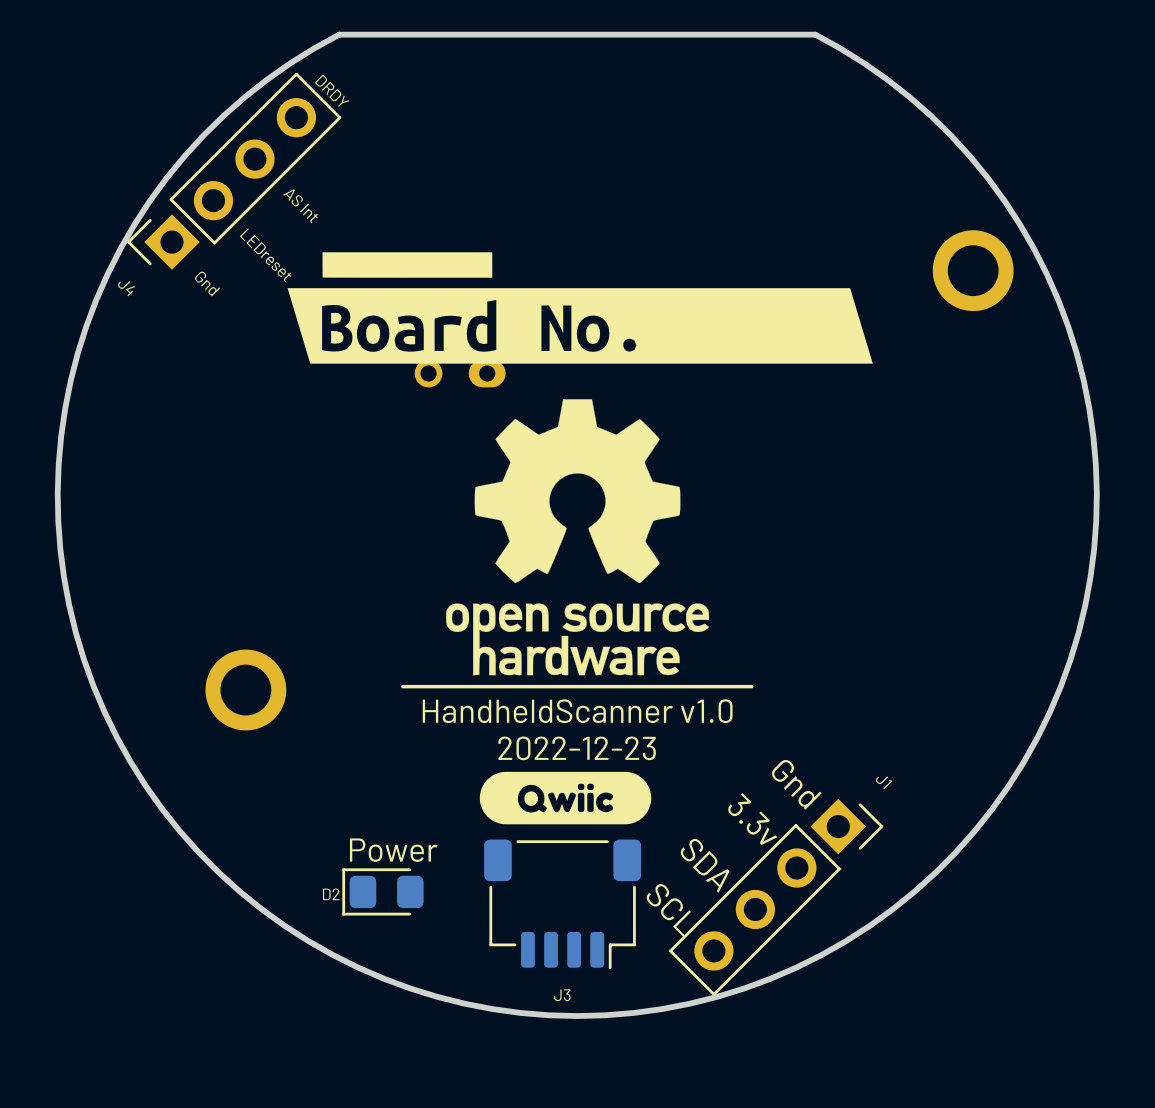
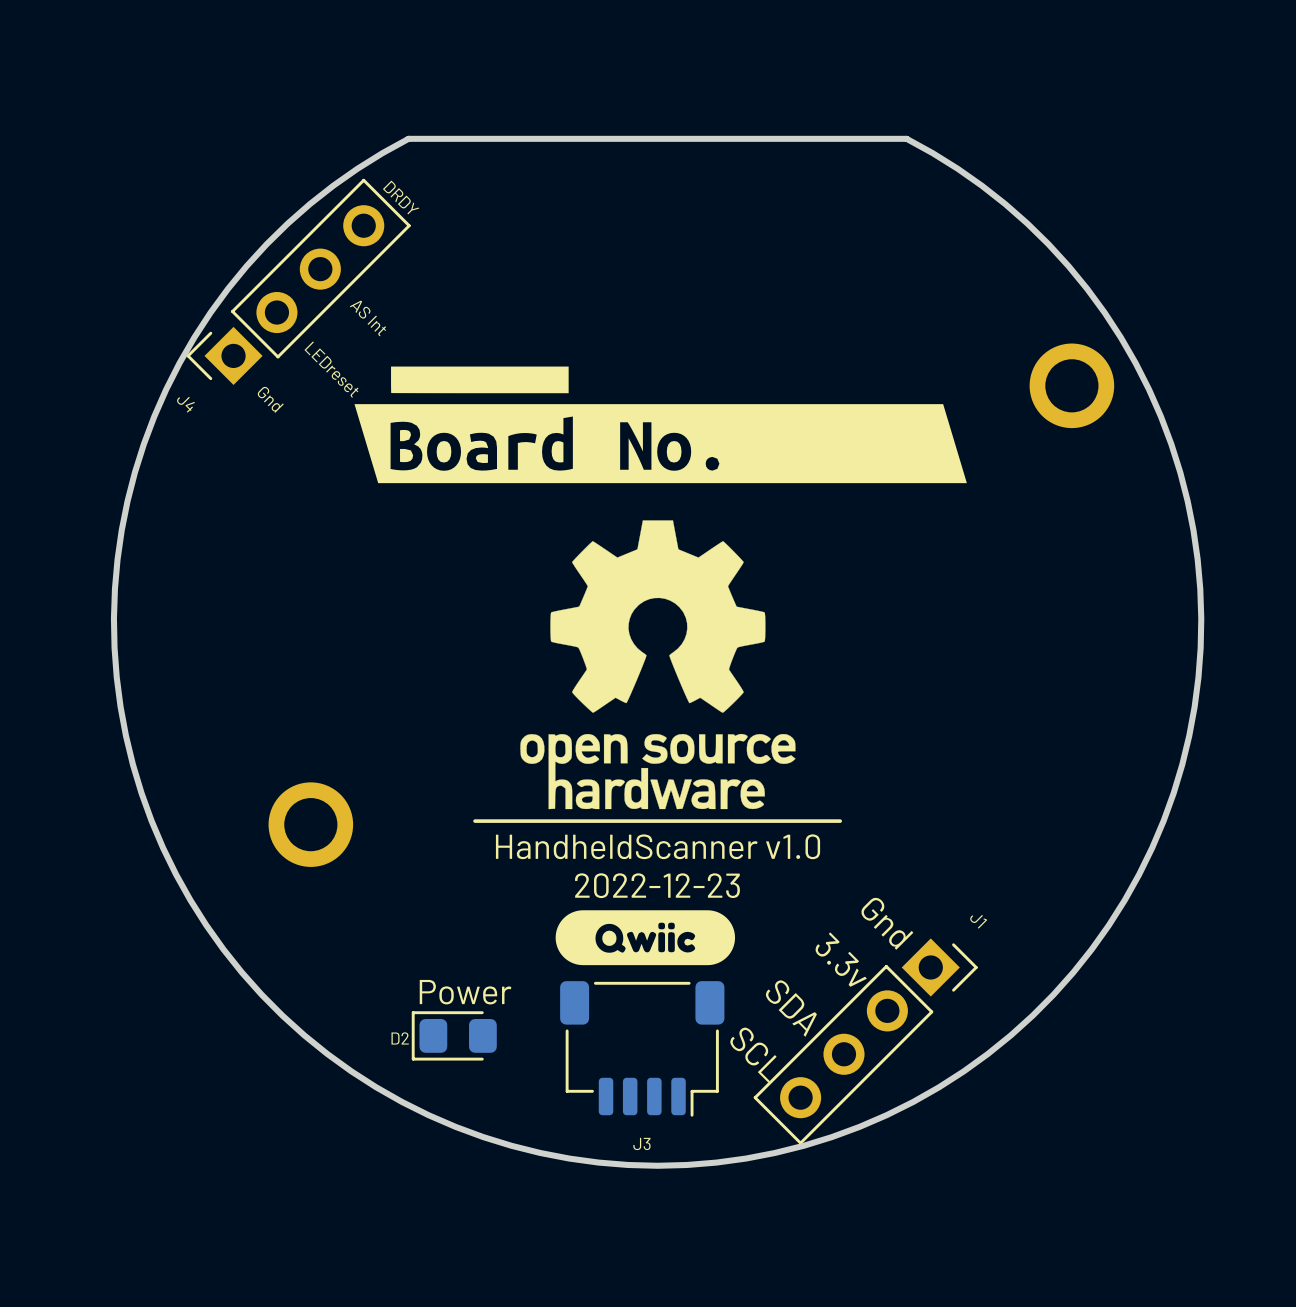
part: (460, 373) -> none

